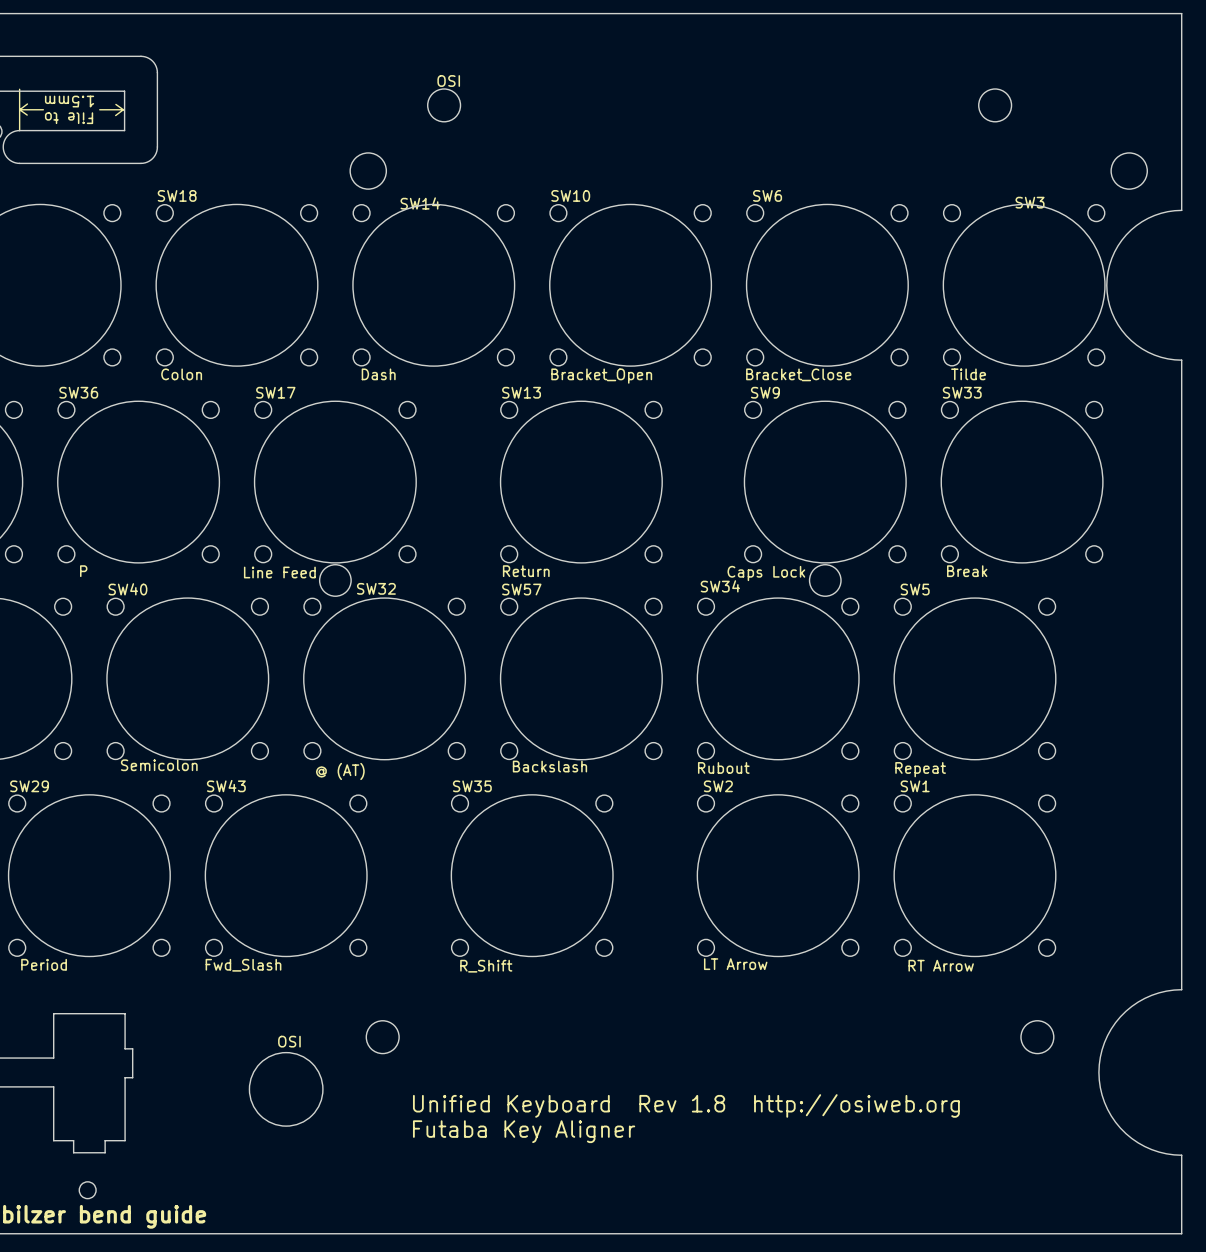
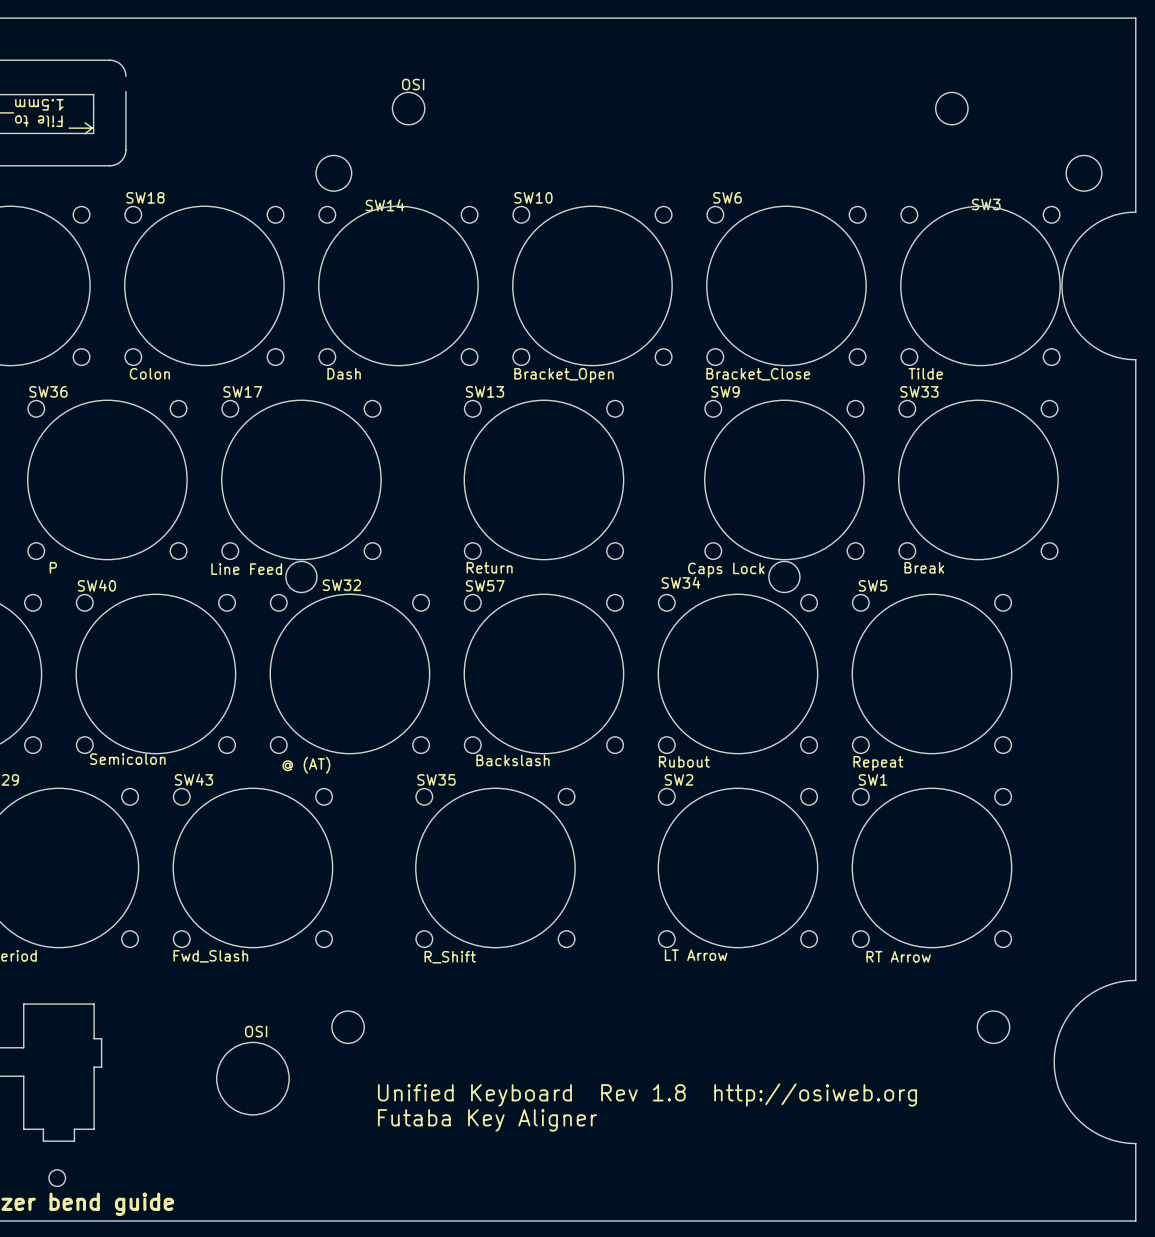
board edge: (157, 72) (157, 88) -> none
line: (115, 104) (123, 109) -> (85, 122) (92, 128)
line: (99, 109) (123, 109) -> none
line: (123, 109) (115, 115) -> none
line: none -> (69, 128) (92, 128) (84, 133)

